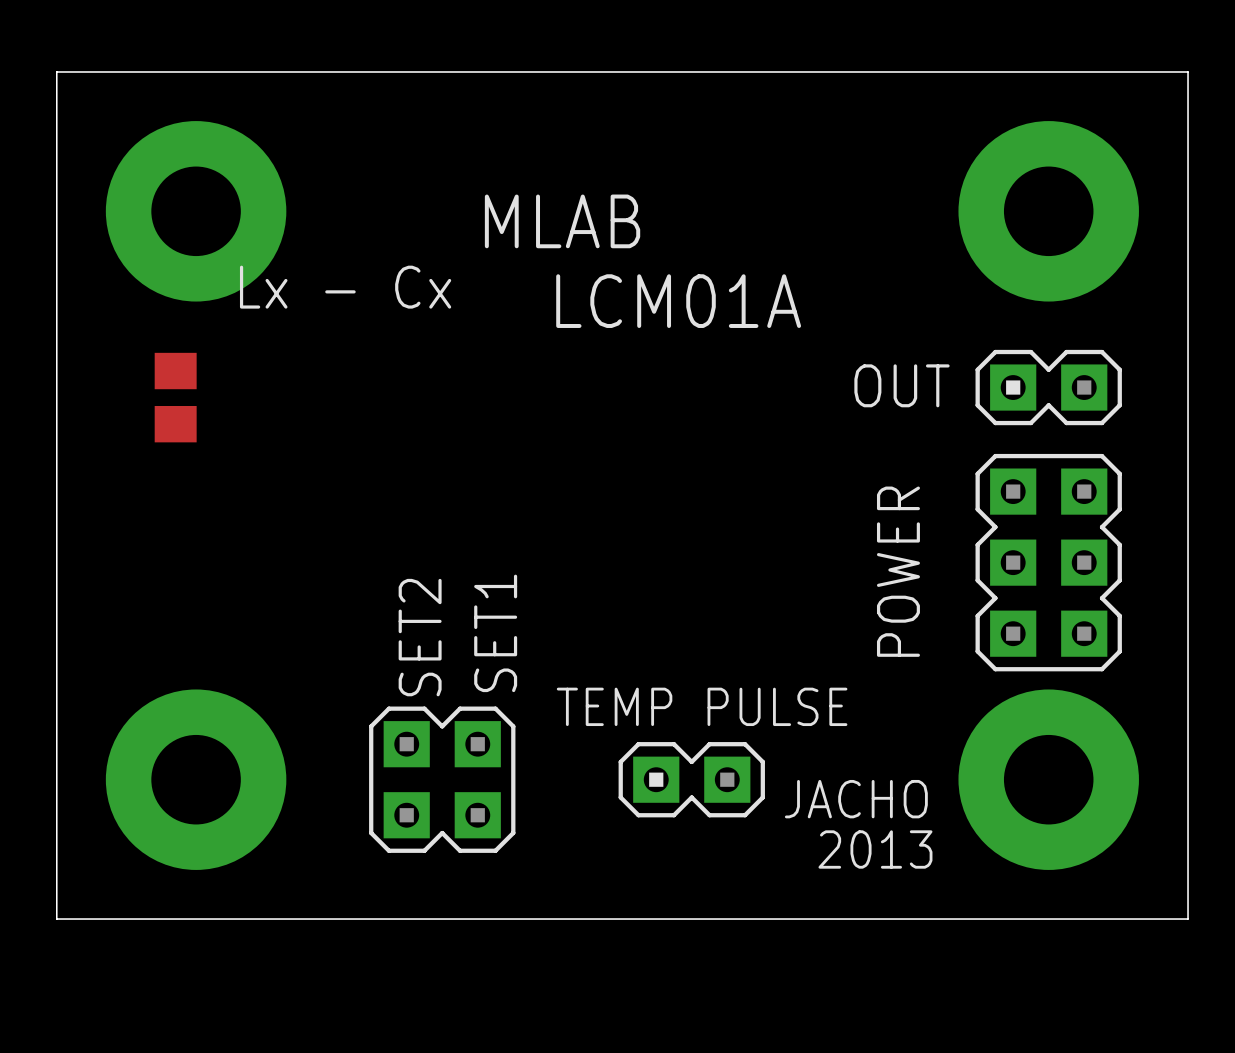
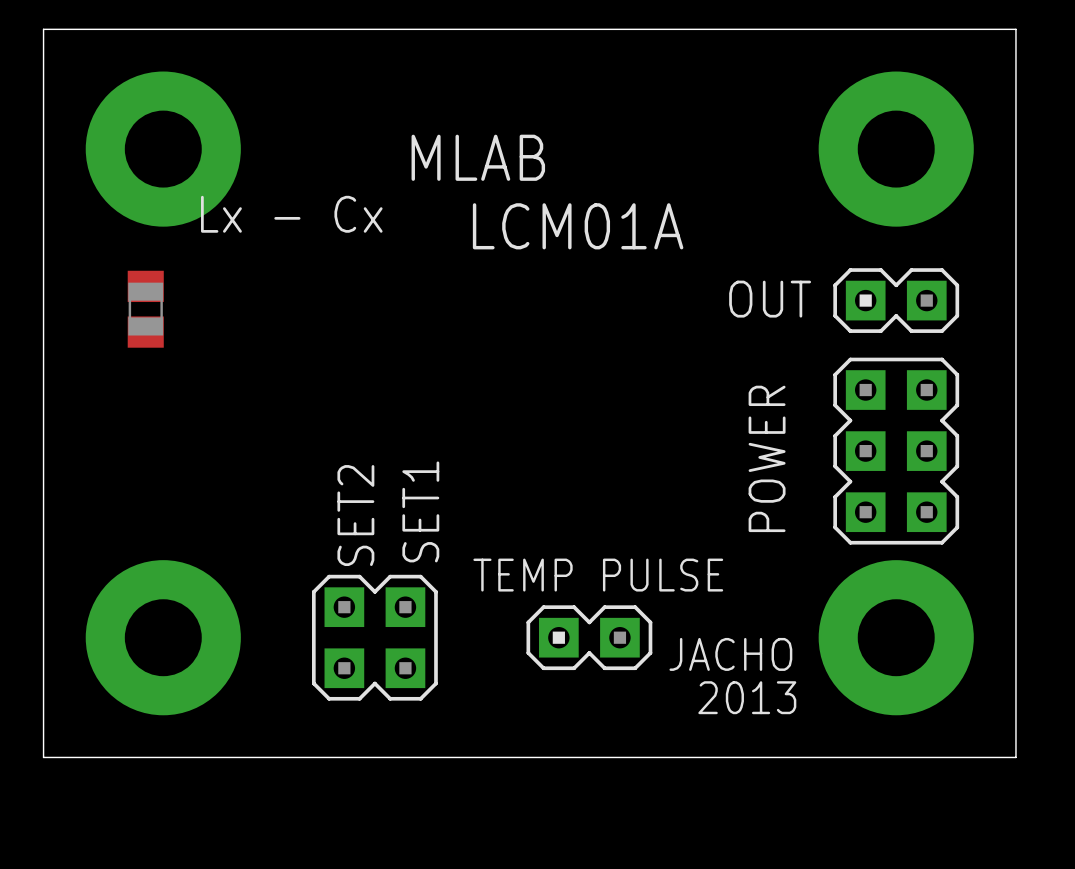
part footprint: [154, 352, 197, 443] -> [127, 270, 164, 348]

